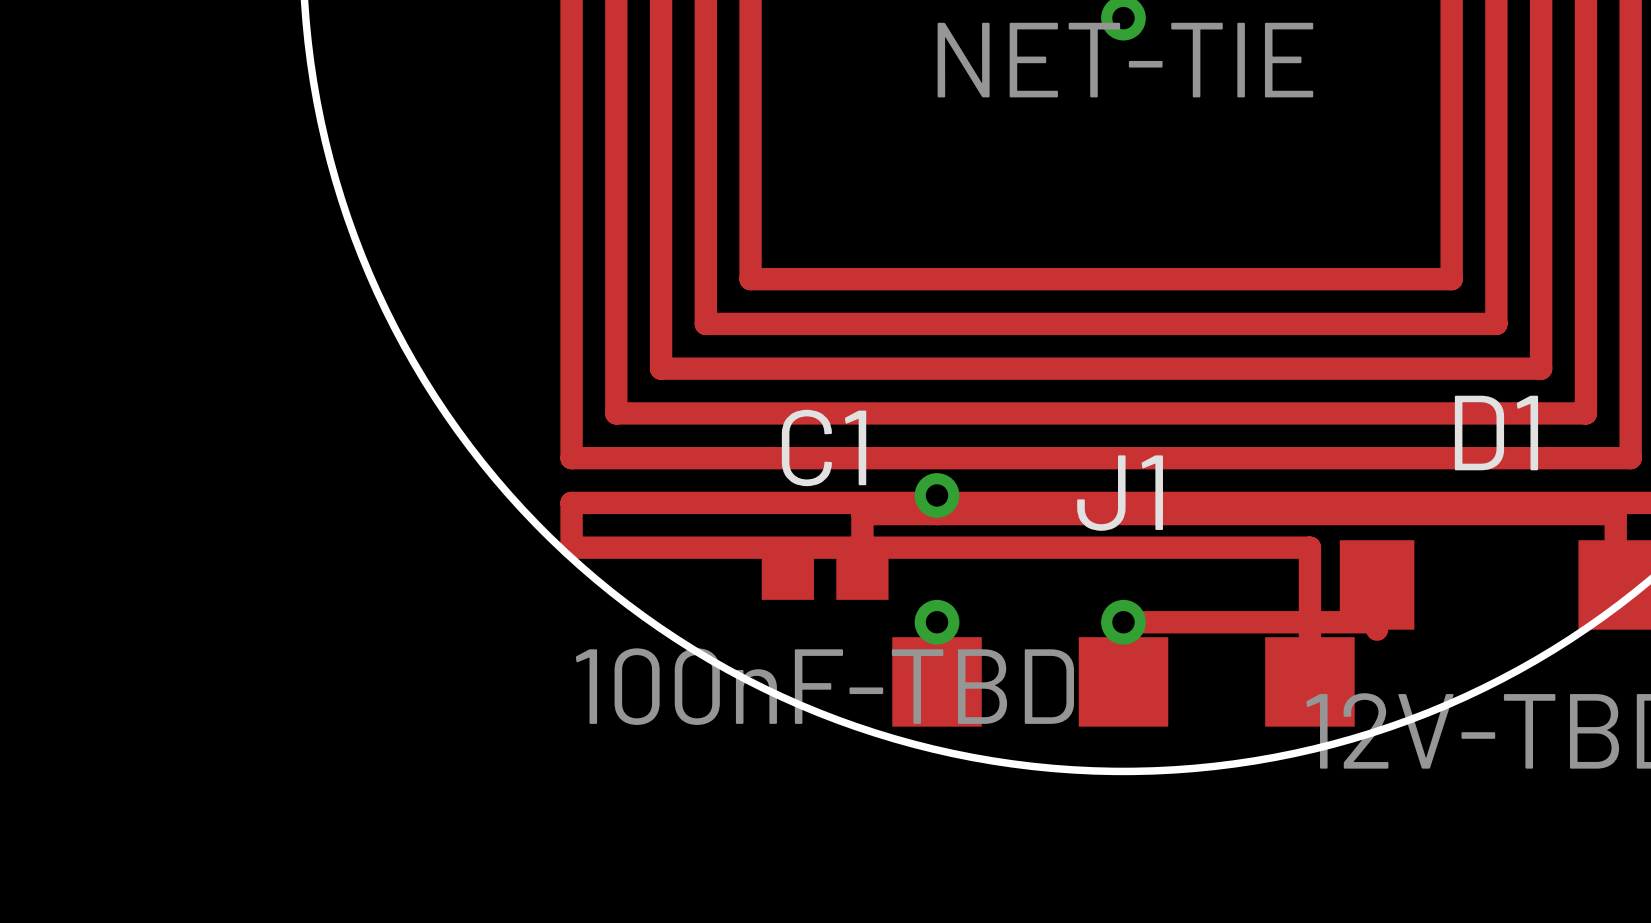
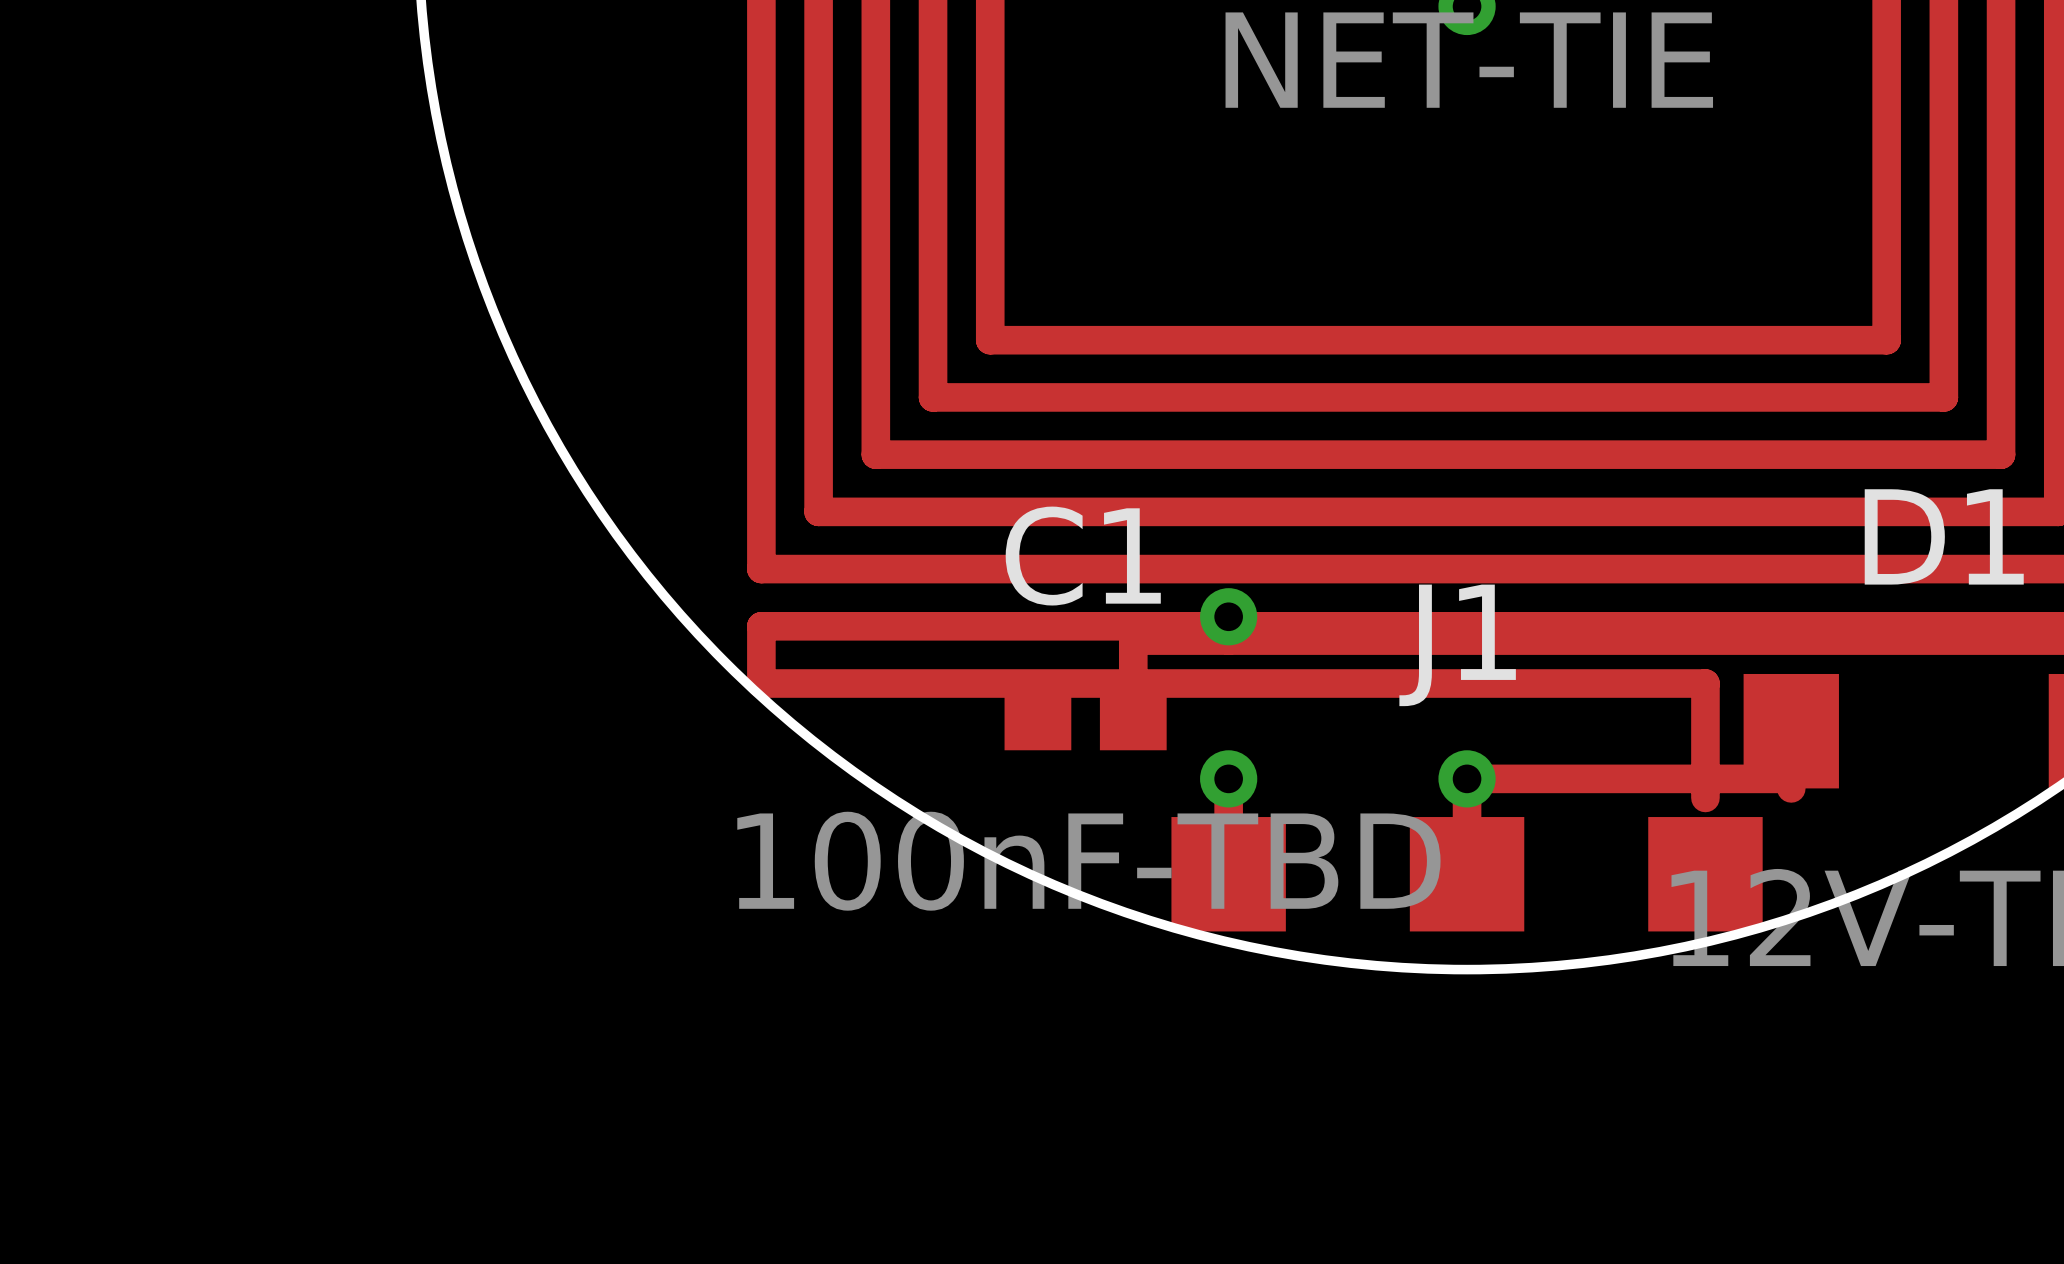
J1 position: (1123, 681) -> (1467, 874)

